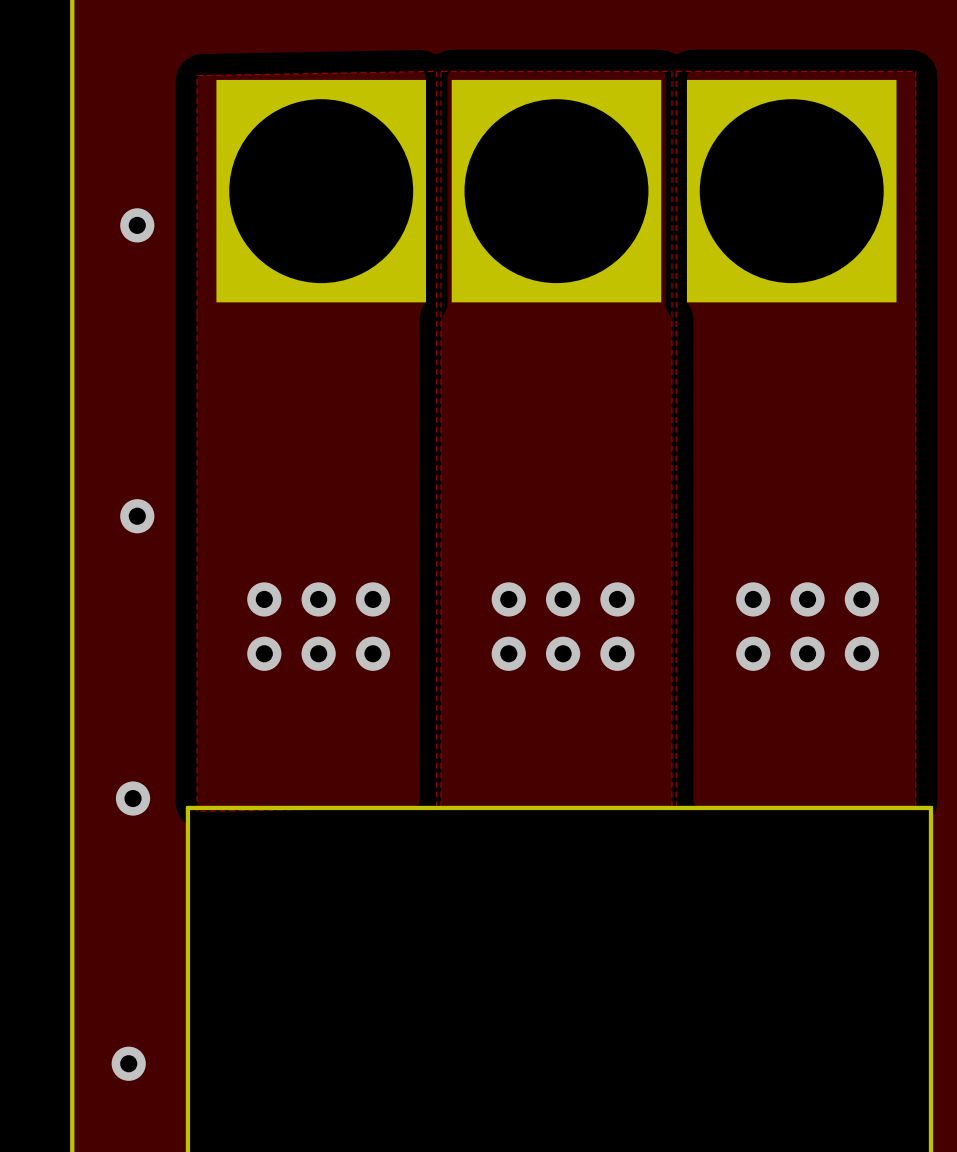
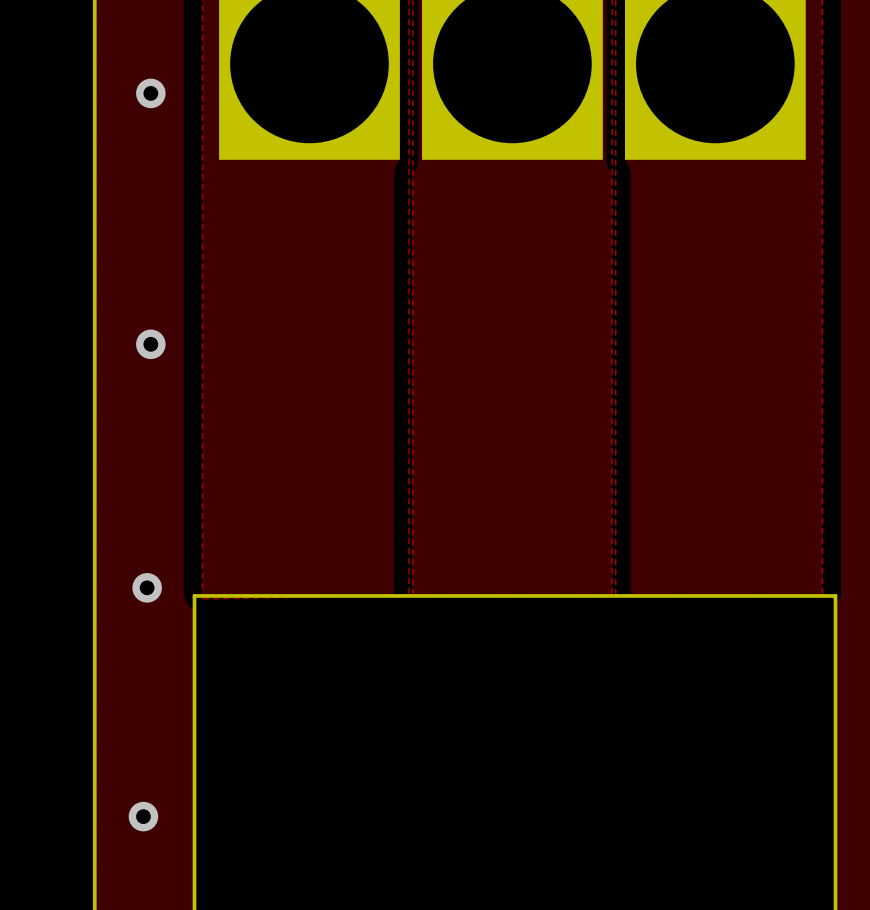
via: (264, 599) -> none
via: (318, 599) -> none
via: (372, 599) -> none
via: (508, 599) -> none
via: (563, 599) -> none
via: (617, 599) -> none
via: (753, 599) -> none
via: (807, 599) -> none
via: (861, 599) -> none
via: (264, 653) -> none
via: (318, 653) -> none
via: (372, 653) -> none
via: (508, 653) -> none
via: (563, 653) -> none
via: (617, 653) -> none
via: (753, 653) -> none
via: (807, 653) -> none
via: (861, 653) -> none

